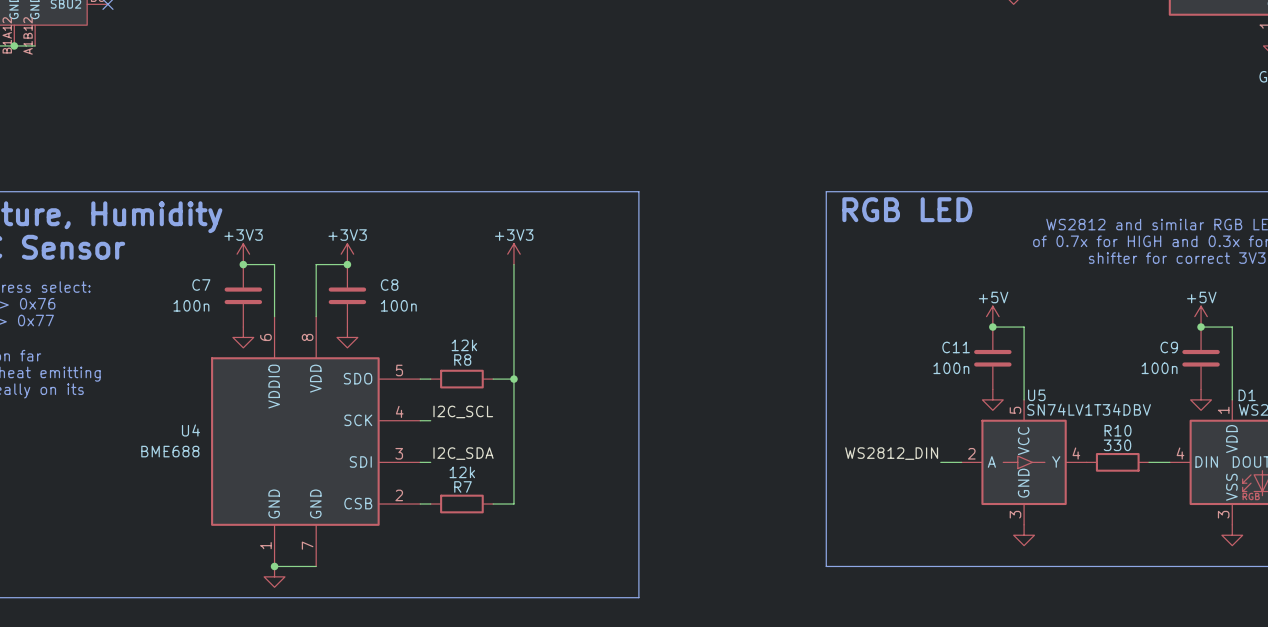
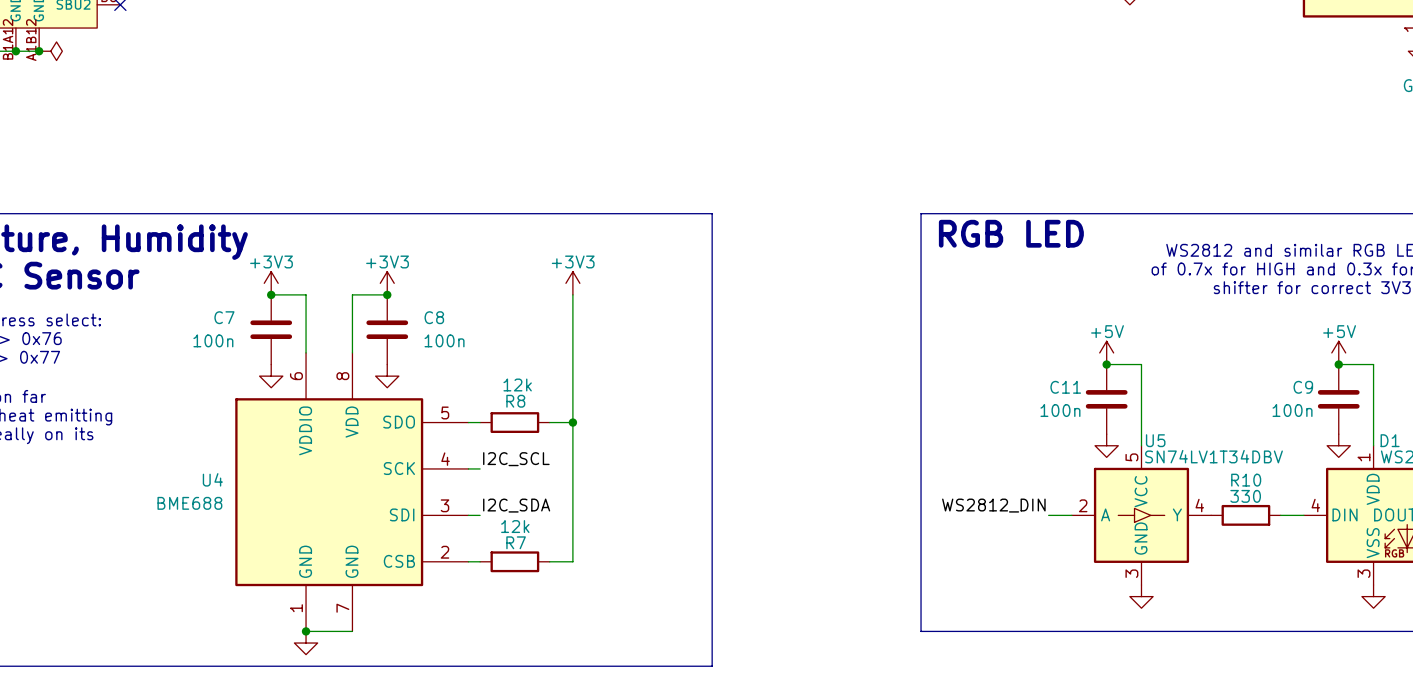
junction: none -> (39, 51)
power symbol: none -> (50, 51)

